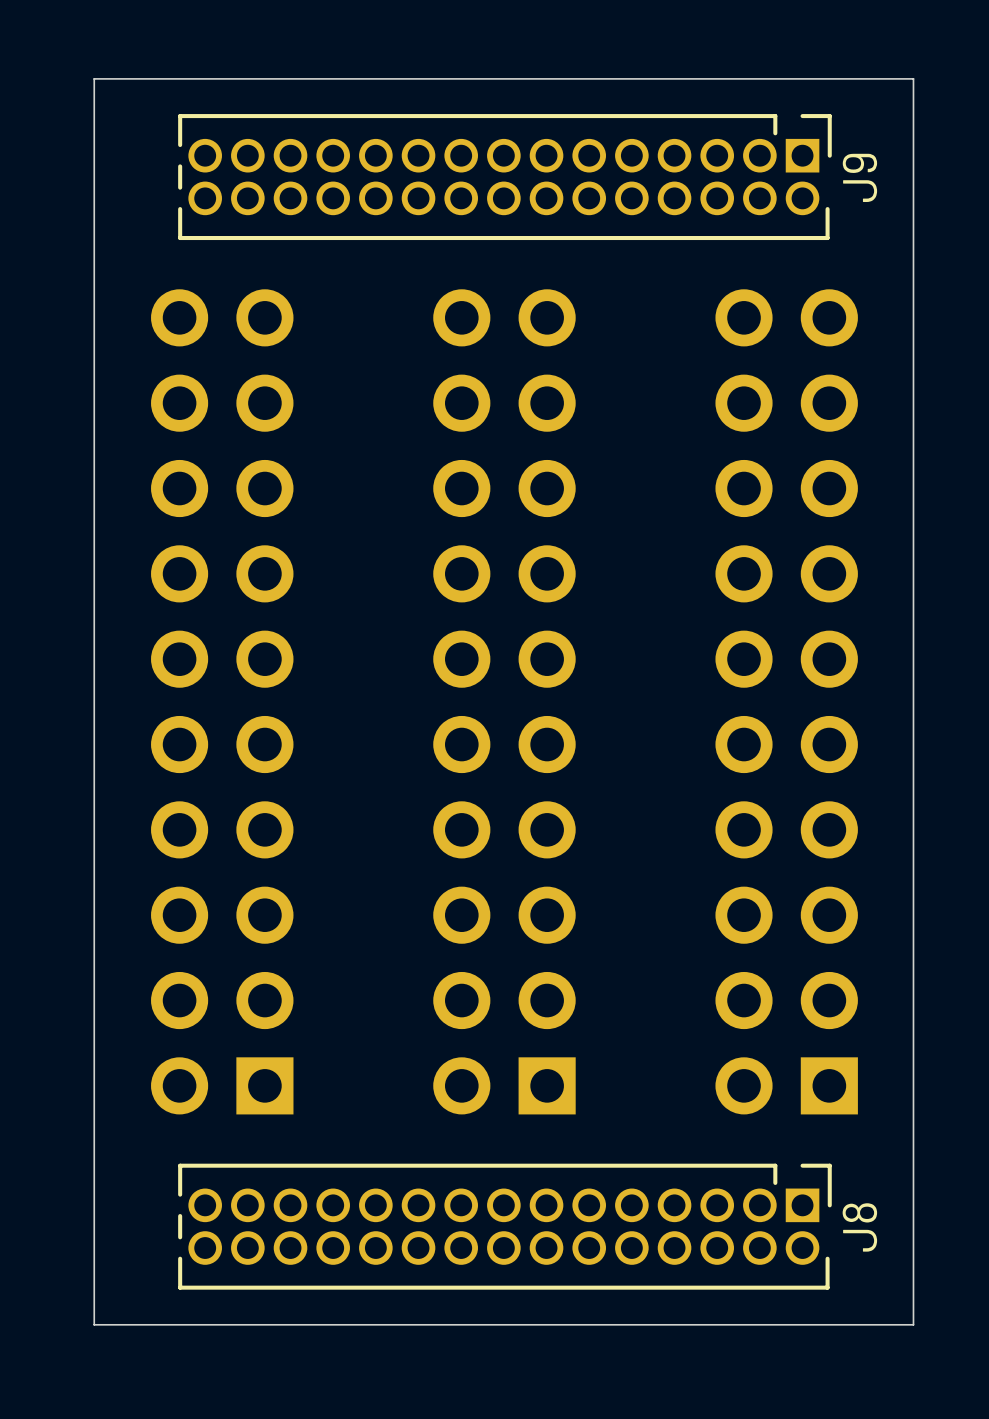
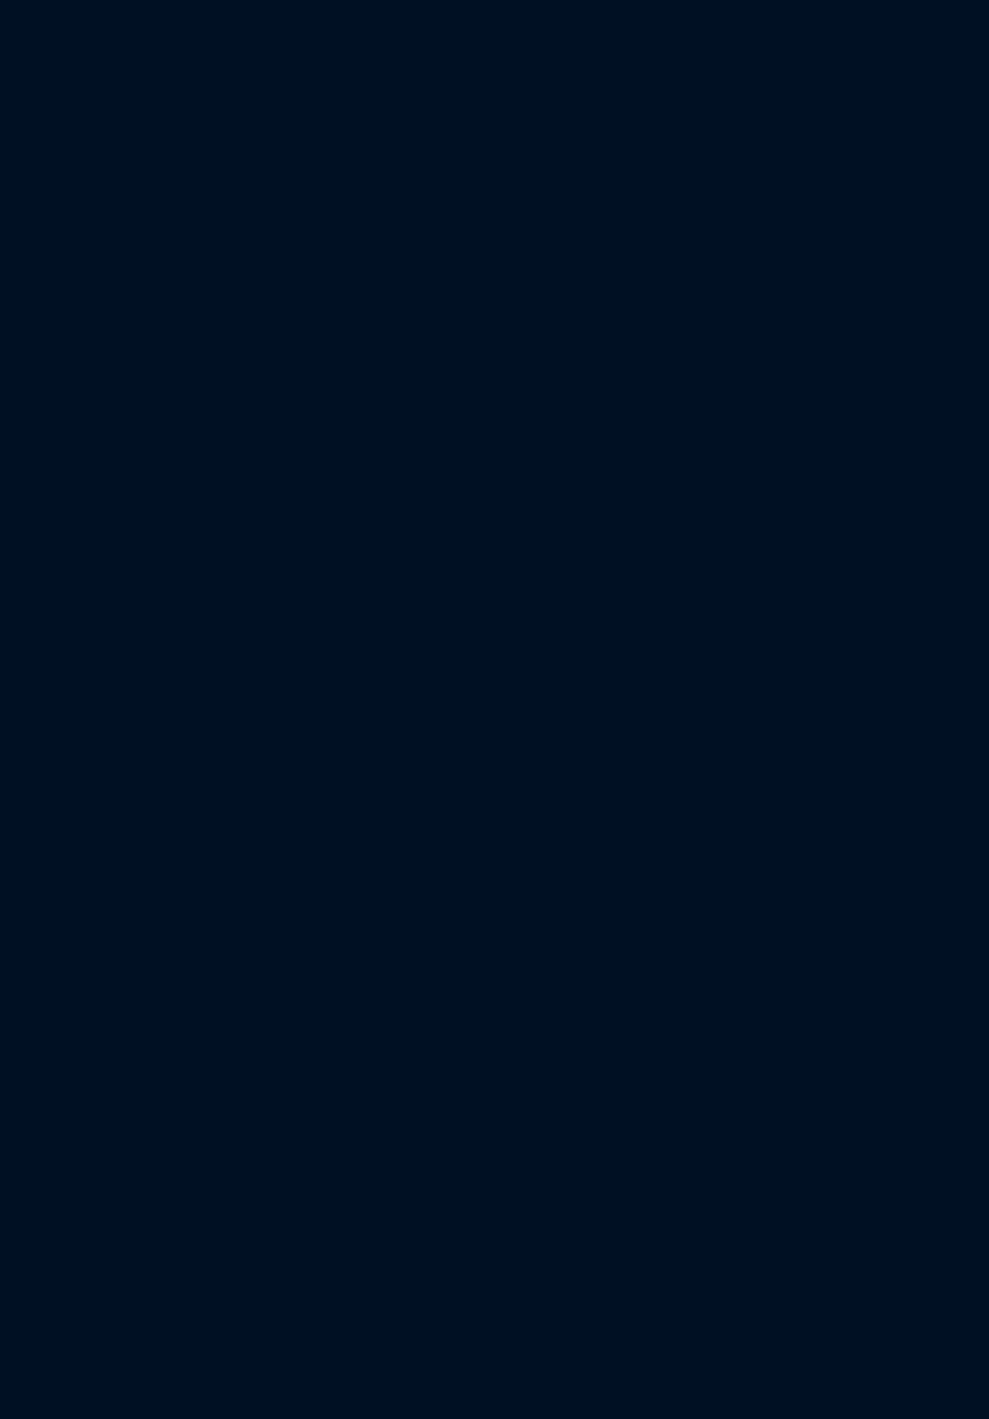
board edge: (94, 78) (913, 78) (913, 1324) (94, 1324) (94, 78) -> none
J9: (504, 177) -> none
part: (222, 701) -> none
part: (504, 701) -> none
part: (786, 701) -> none
J8: (504, 1226) -> none

